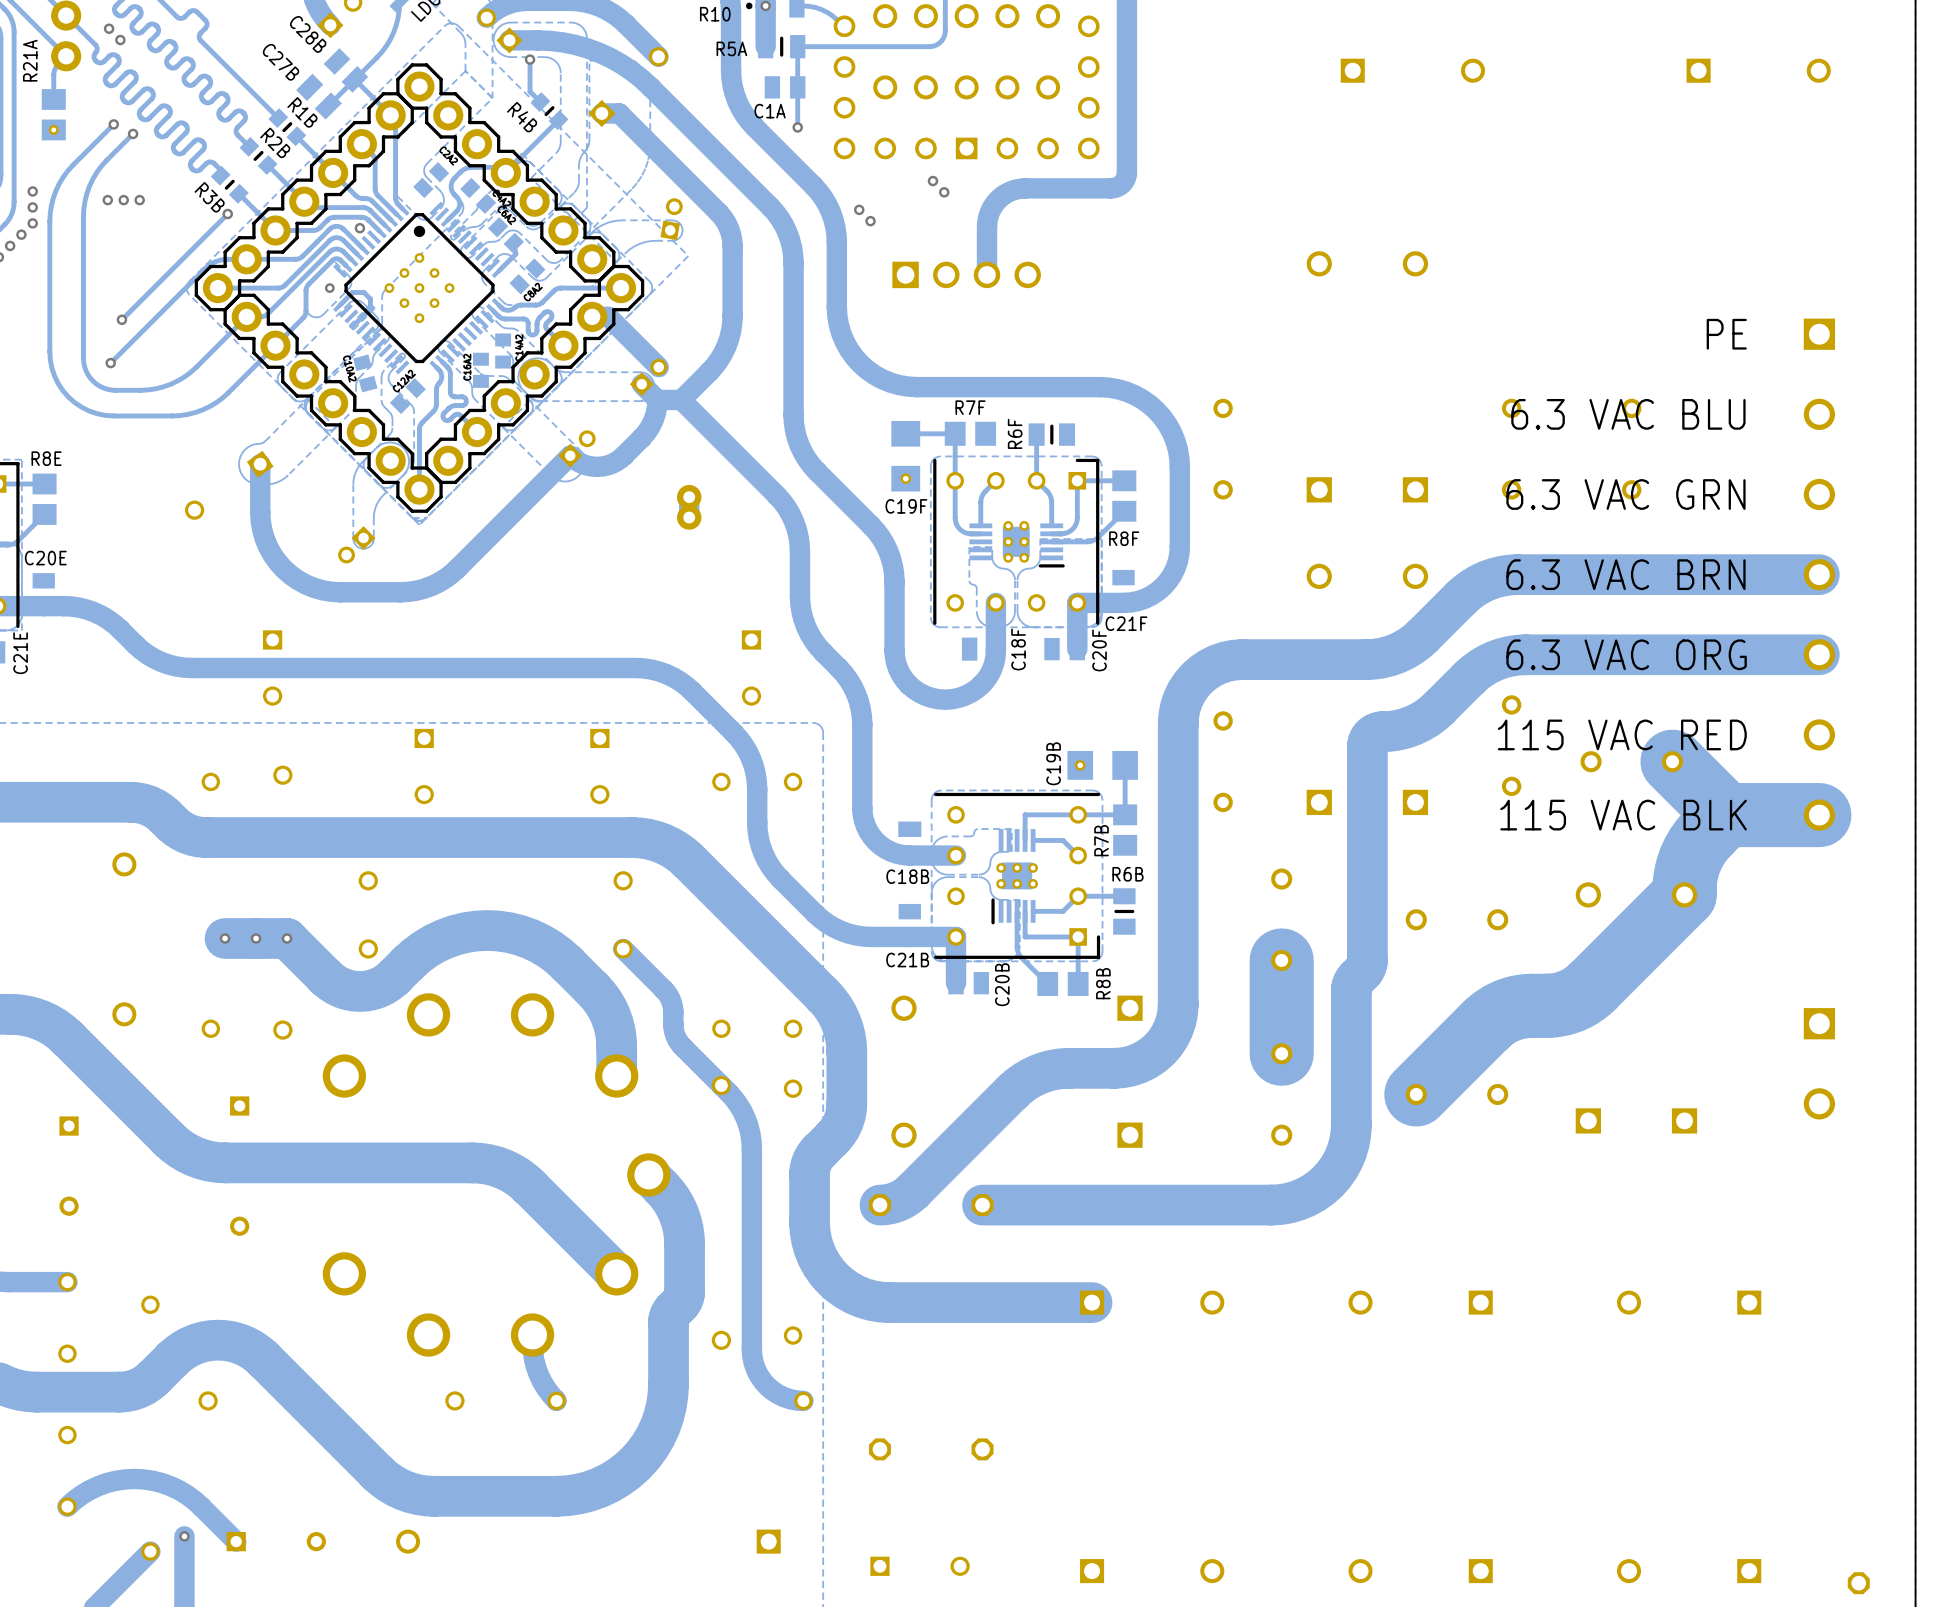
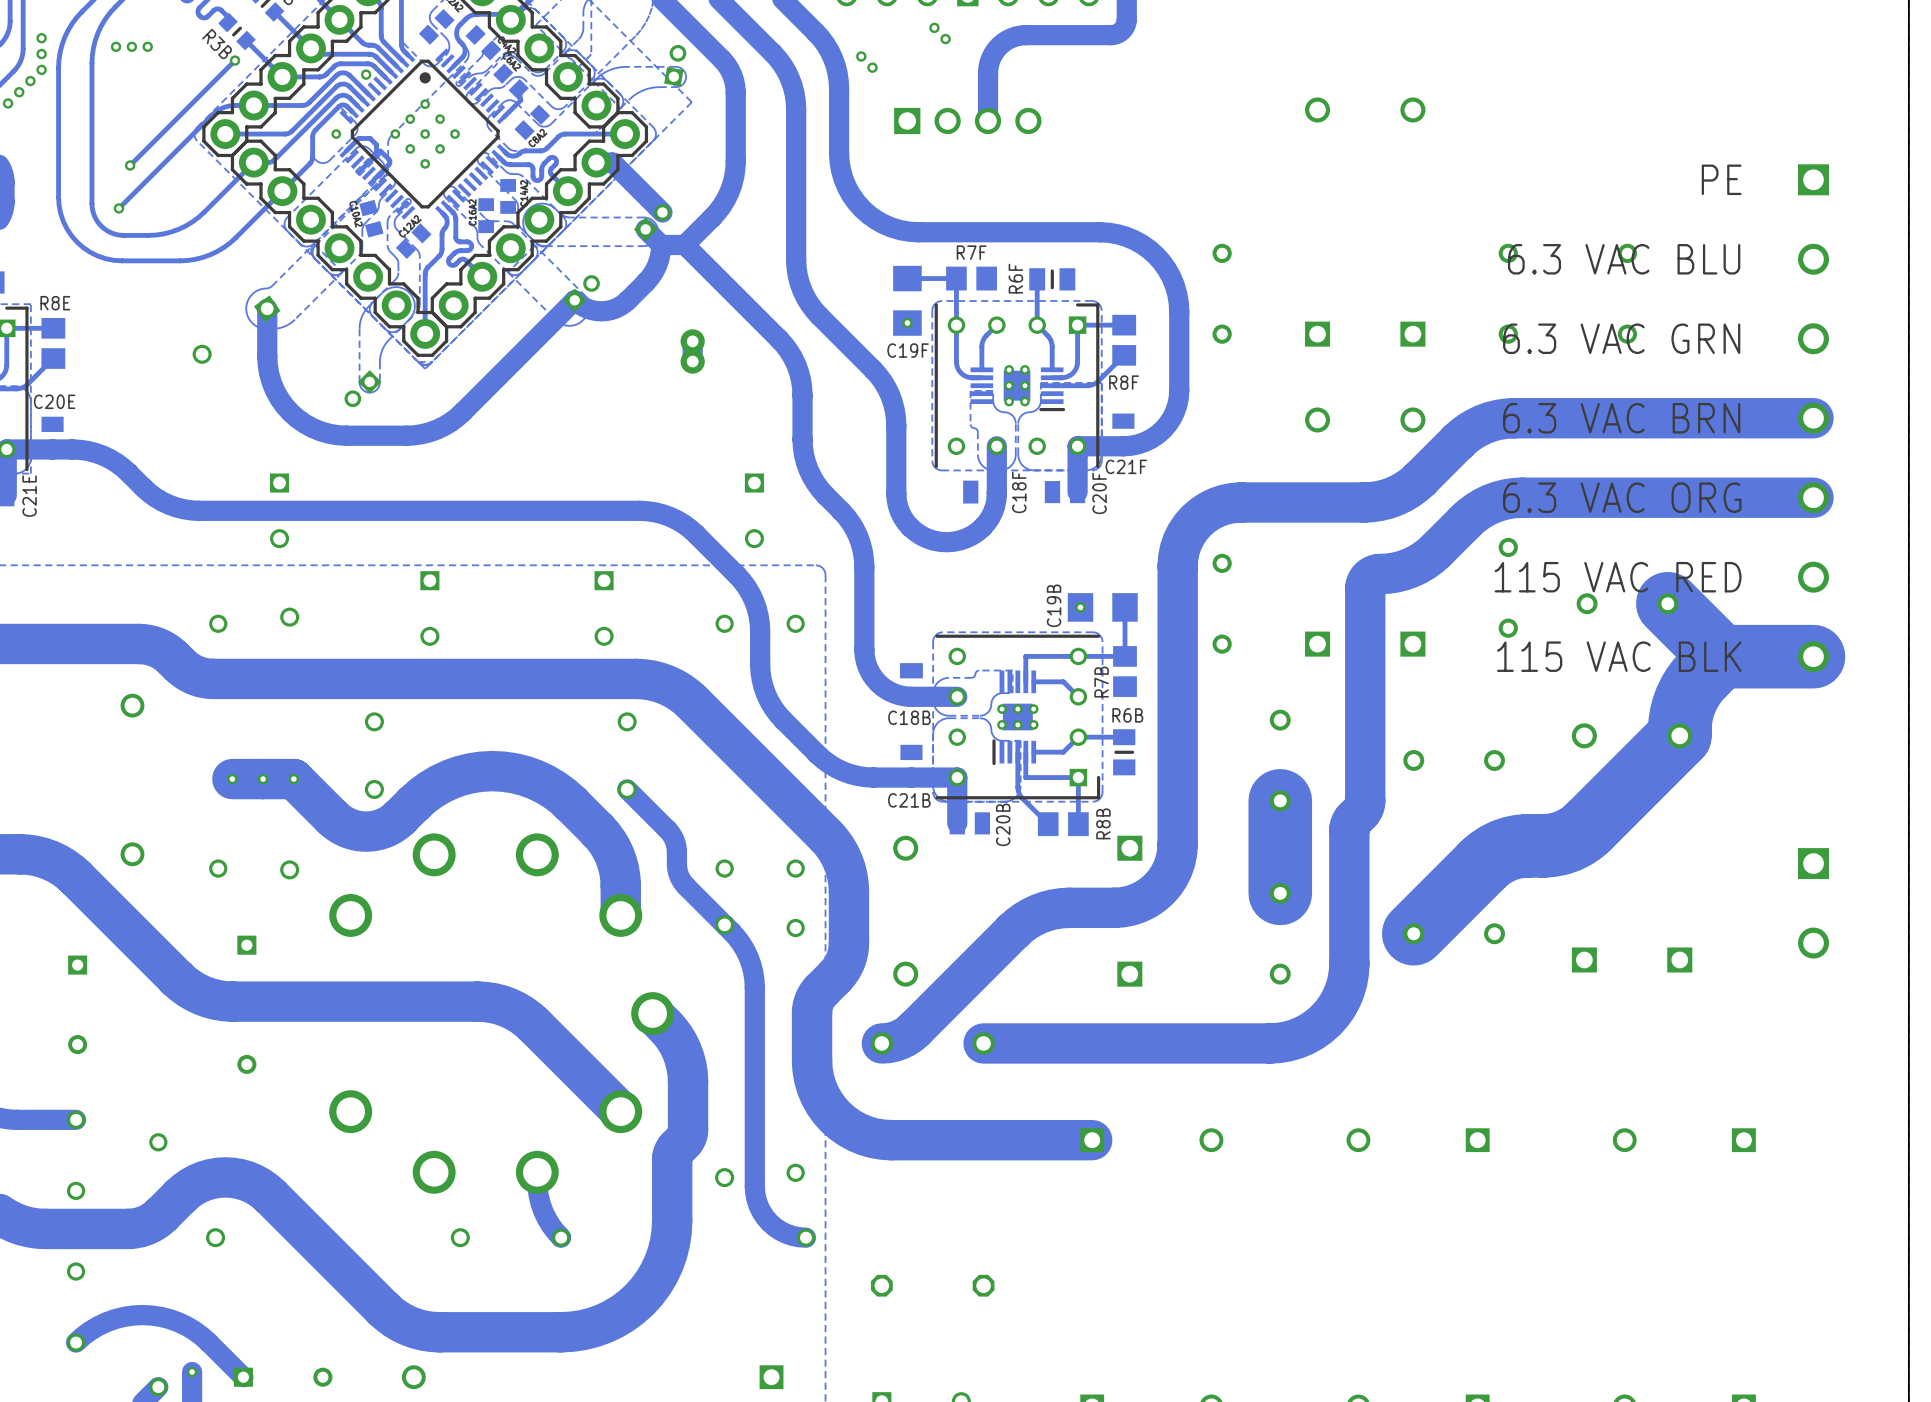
track: none -> (380, 150) (389, 159) (389, 163) (374, 179)

